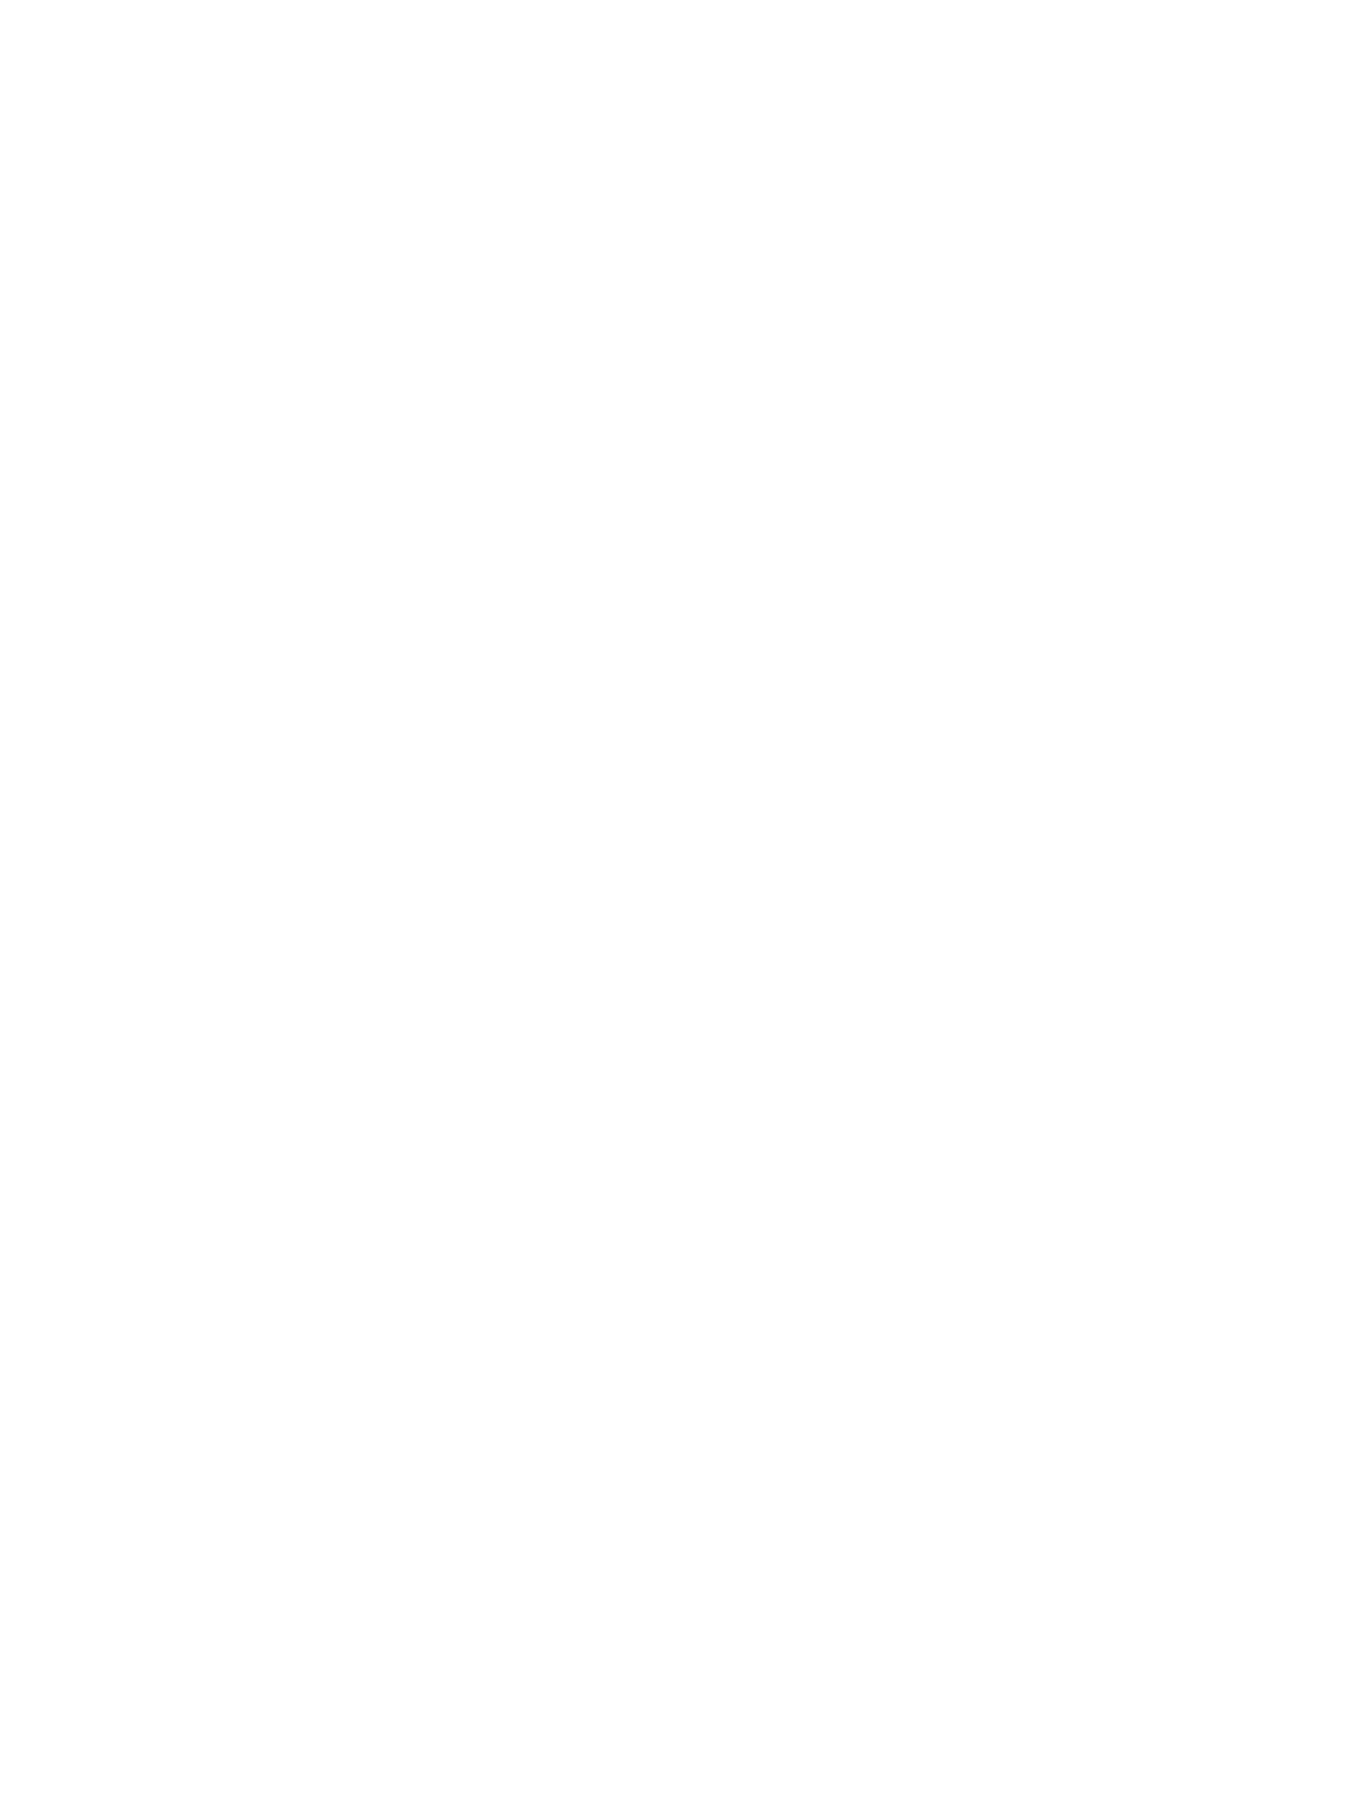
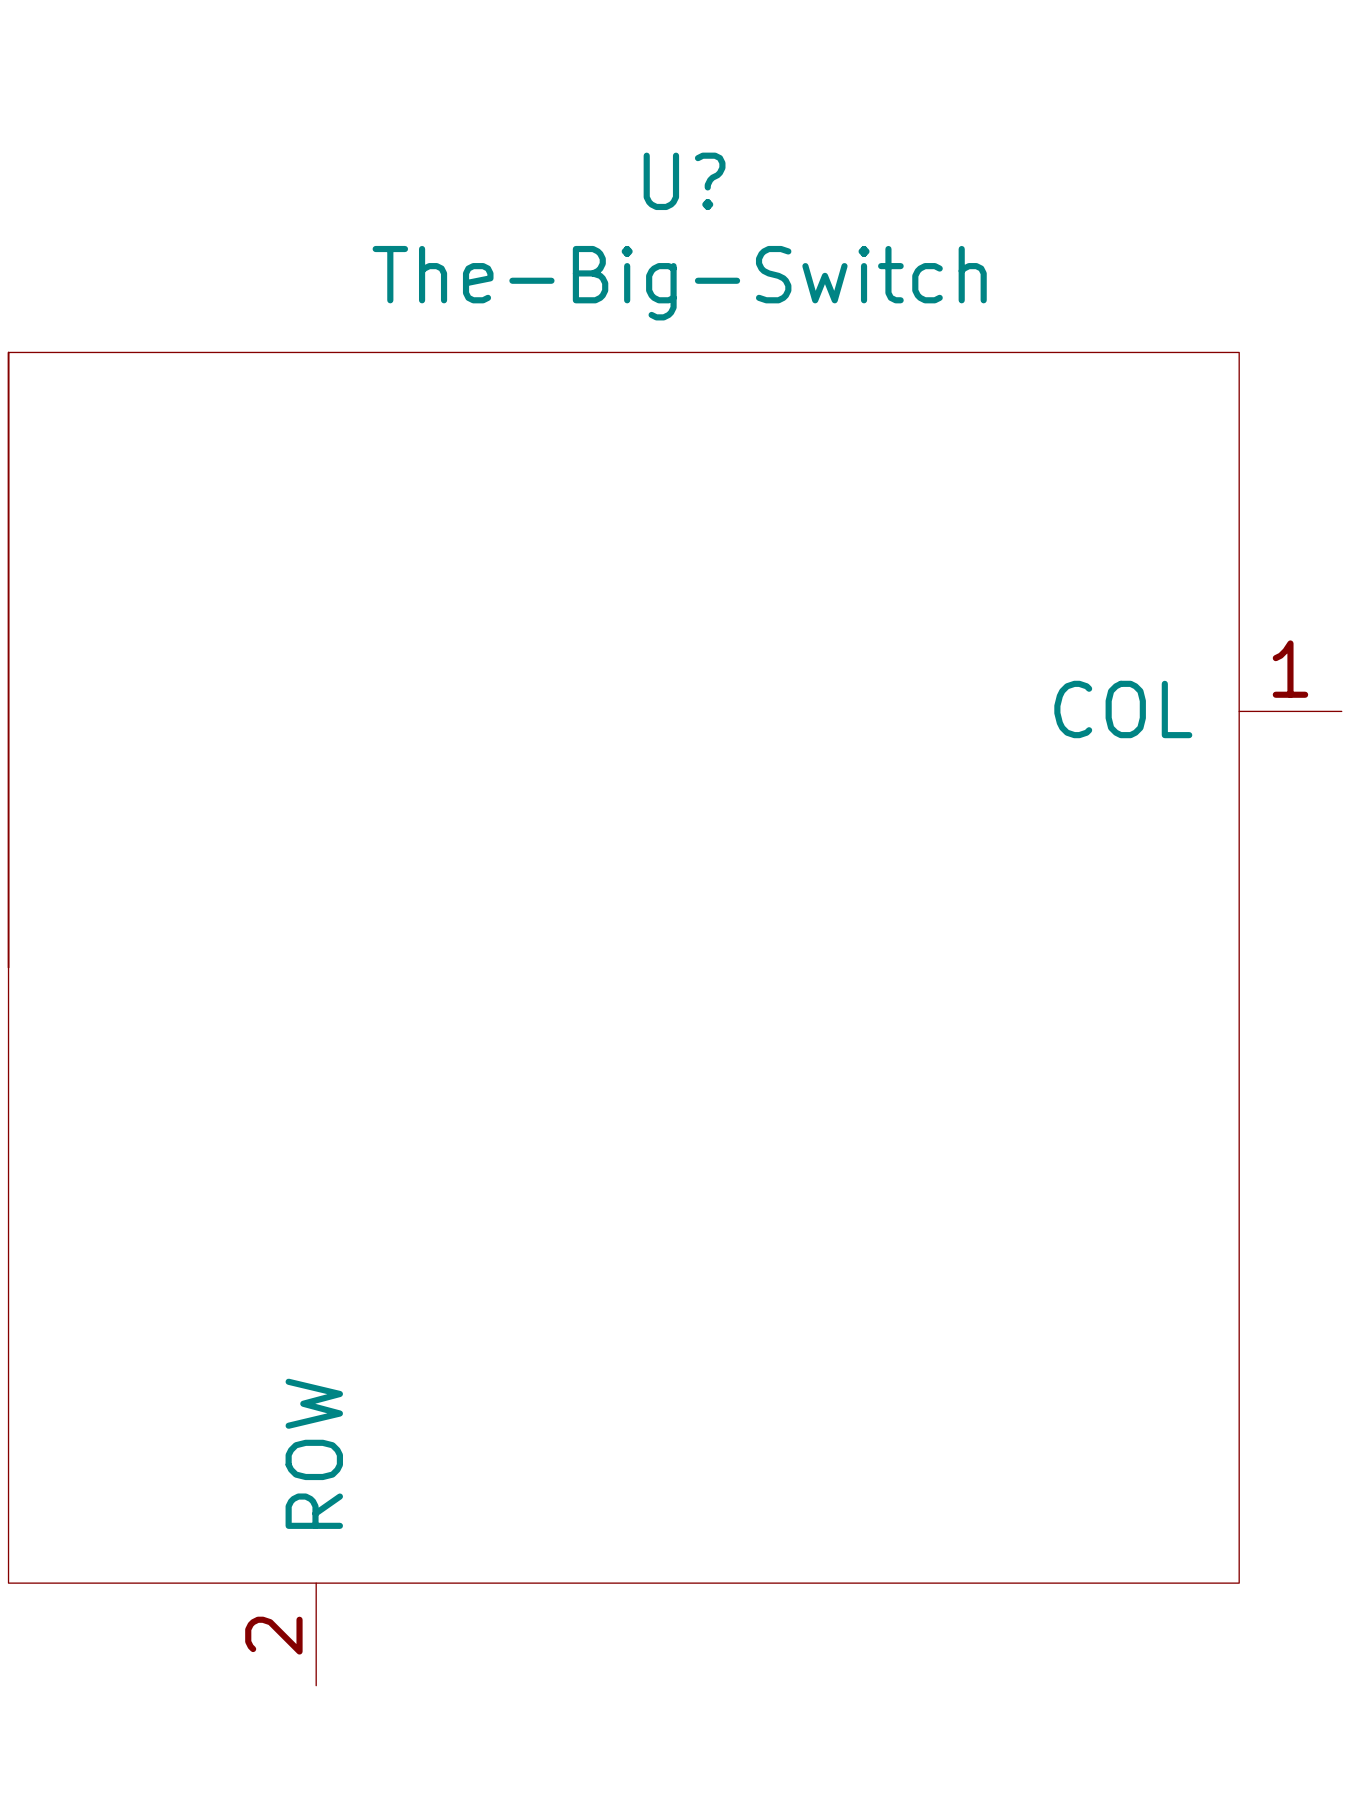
U?: none -> The-Big-Switch (675, 1019)

